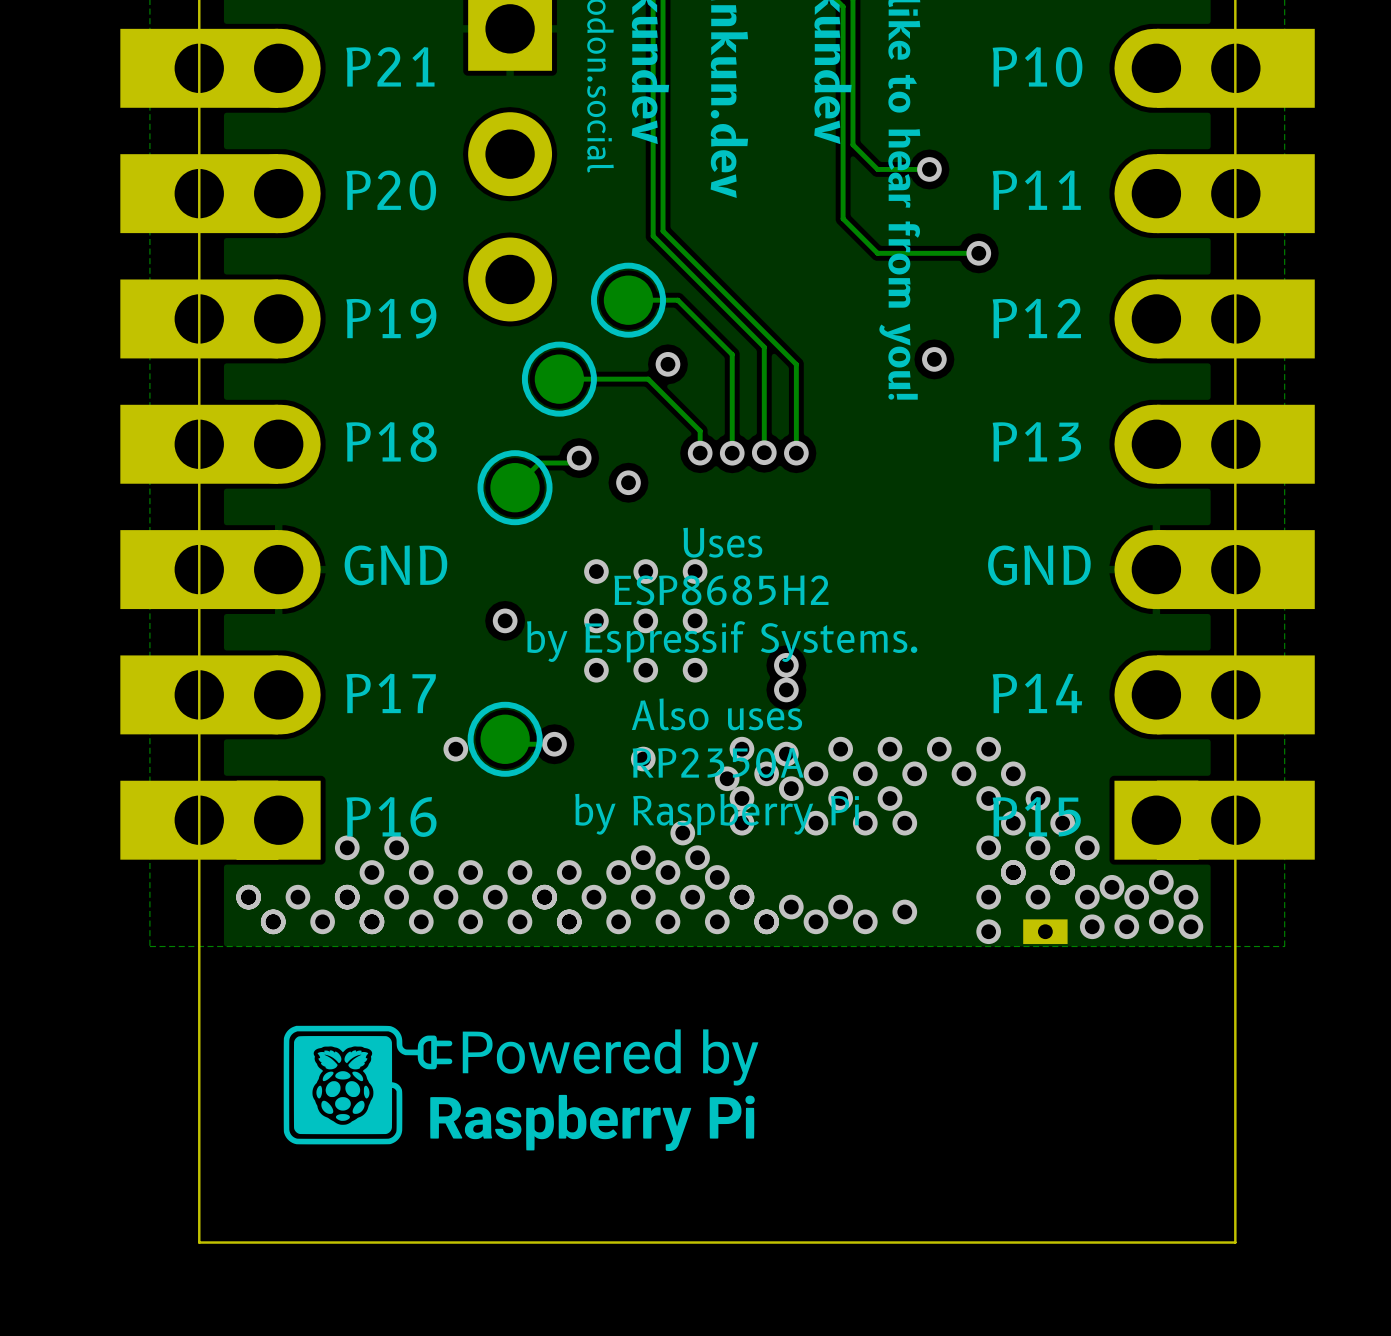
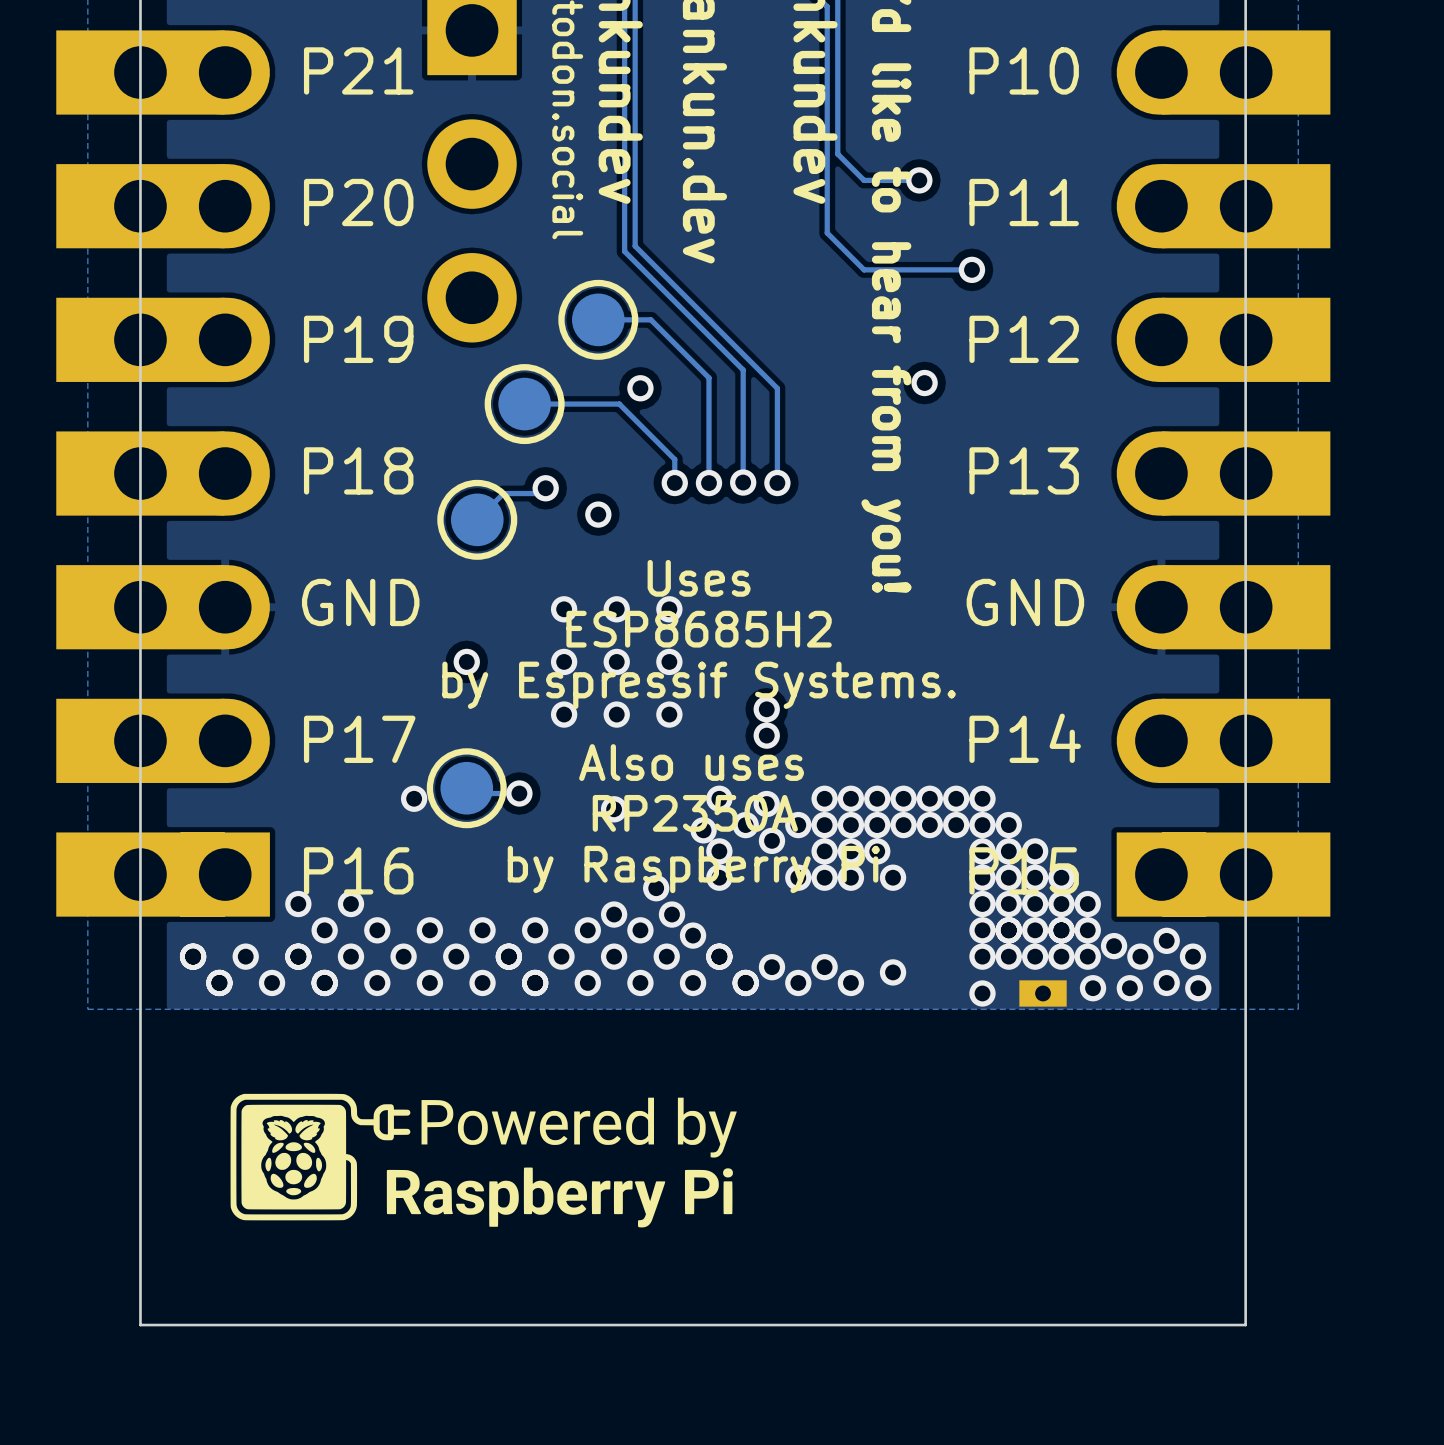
via: none -> (850, 798)
via: none -> (903, 798)
via: none -> (956, 798)
via: none -> (824, 825)
via: none -> (877, 825)
via: none -> (929, 825)
via: none -> (982, 825)
via: none -> (850, 851)
via: none -> (1008, 851)
via: none -> (824, 877)
via: none -> (982, 877)
via: none -> (1035, 877)
via: none -> (1008, 904)
via: none -> (1061, 904)
via: none -> (982, 930)
via: none -> (1035, 930)
via: none -> (1087, 930)
via: none -> (1008, 956)
via: none -> (1061, 956)

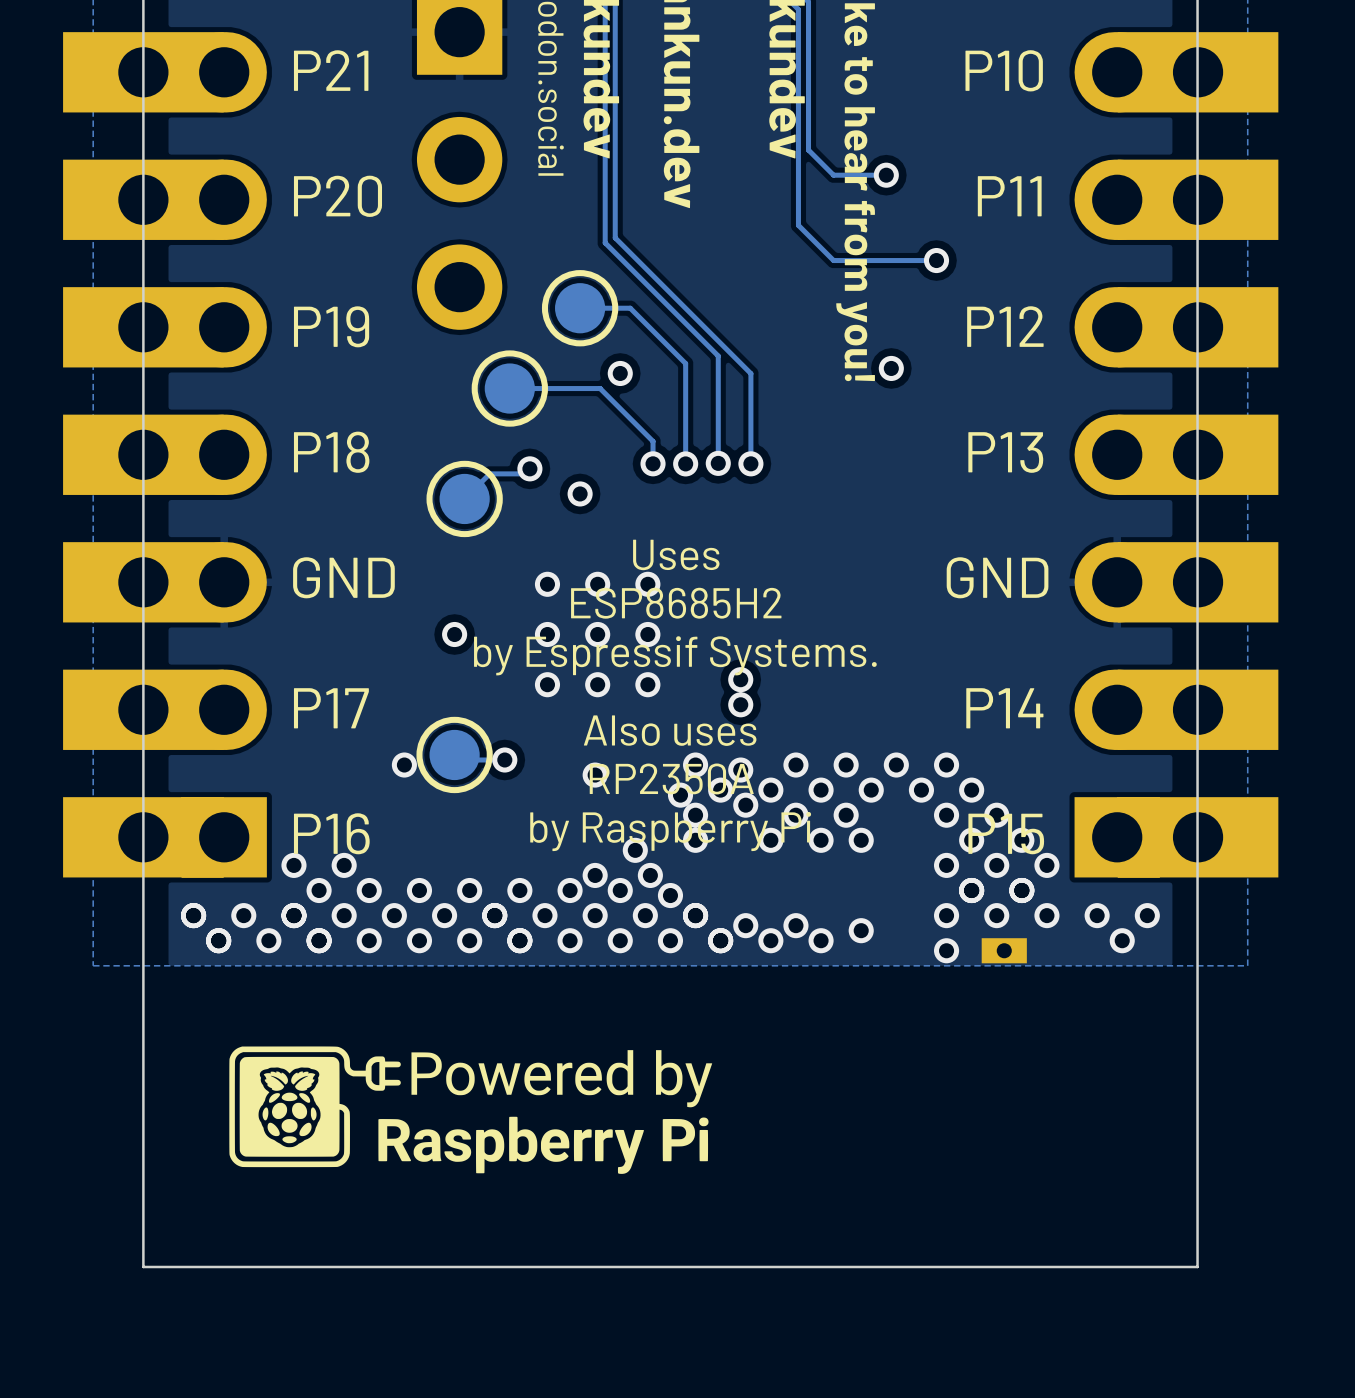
via: (850, 798) -> none
via: (903, 798) -> none
via: (956, 798) -> none
via: (824, 825) -> none
via: (877, 825) -> none
via: (929, 825) -> none
via: (982, 825) -> none
via: (850, 851) -> none
via: (1008, 851) -> none
via: (824, 877) -> none
via: (982, 877) -> none
via: (1035, 877) -> none
via: (1008, 904) -> none
via: (1061, 904) -> none
via: (982, 930) -> none
via: (1035, 930) -> none
via: (1087, 930) -> none
via: (1166, 940) -> none
via: (1114, 946) -> none
via: (1008, 956) -> none
via: (1061, 956) -> none
via: (1093, 988) -> none
via: (1129, 988) -> none
via: (1198, 988) -> none

